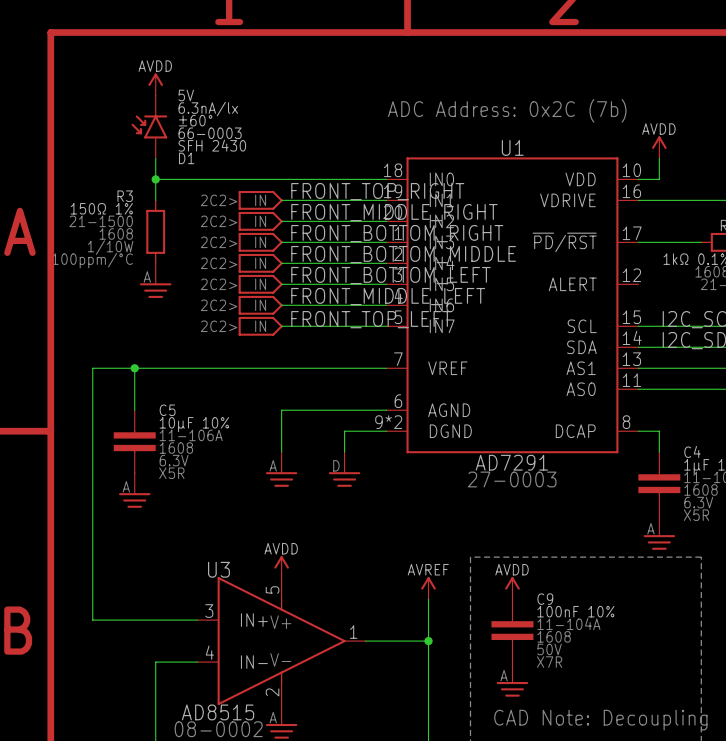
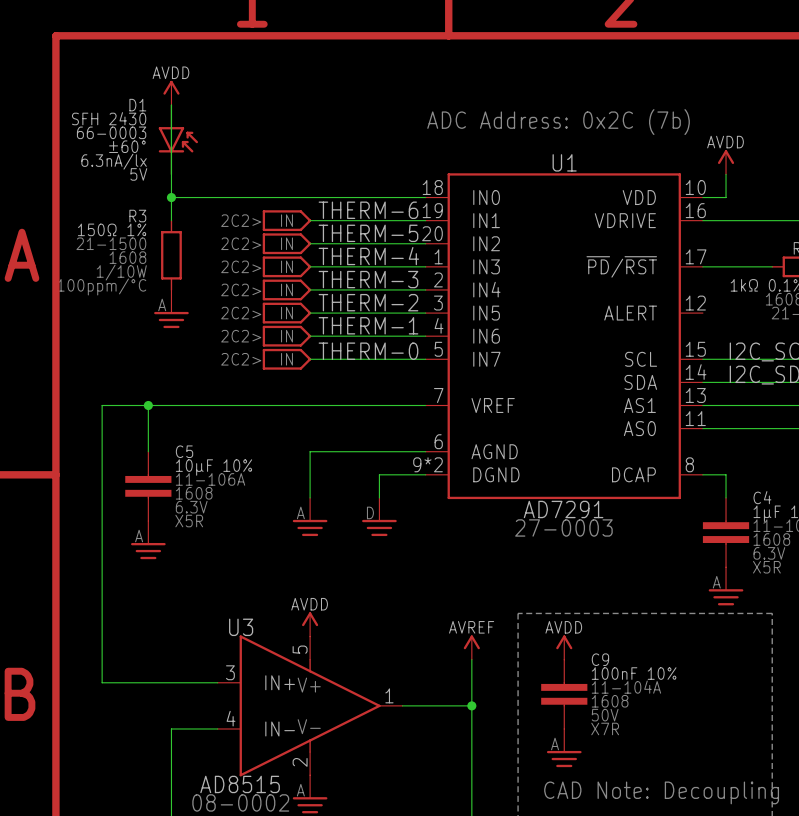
D1 rotation: 0° (149, 126) -> 180° (178, 139)
label: FRONT_TOP_RIGHT (377, 191) -> THERM-6 (368, 210)
label: FRONT_MIDDLE_RIGHT (394, 212) -> THERM-5 (368, 233)
label: FRONT_BOTTOM_RIGHT (397, 233) -> THERM-4 (368, 256)
label: FRONT_BOTTOM_MIDDLE (403, 254) -> THERM-3 (368, 279)
label: FRONT_BOTTOM_LEFT (390, 275) -> THERM-2 (368, 302)
label: FRONT_MIDDLE_LEFT (388, 296) -> THERM-1 (368, 325)
label: FRONT_TOP_LEFT (371, 319) -> THERM-0 (368, 351)

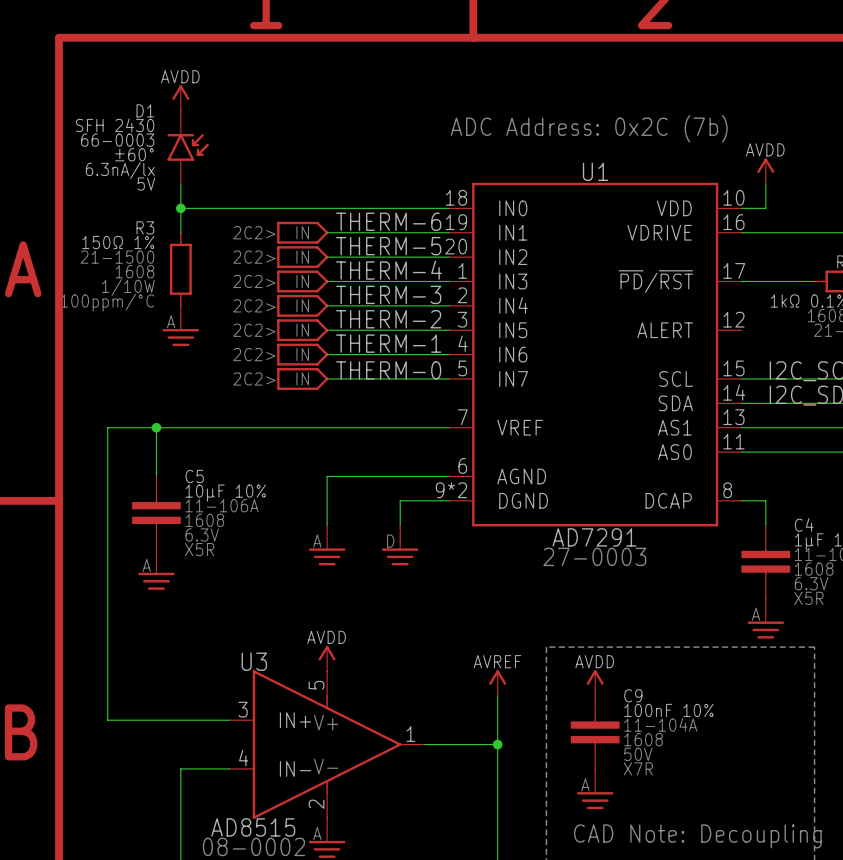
D1 flip: as is (178, 139) -> up-down (188, 147)

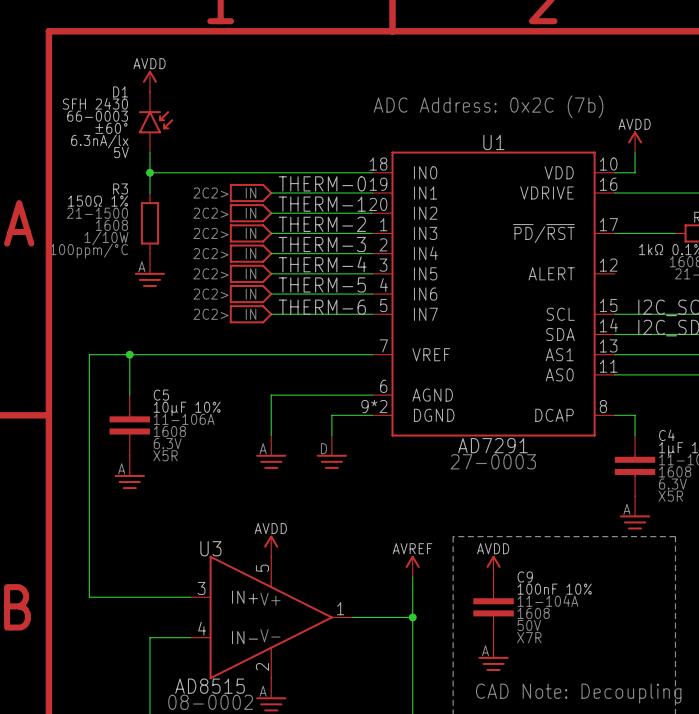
label: THERM-6 (388, 221) -> THERM-0 (322, 183)
label: THERM-5 (388, 246) -> THERM-1 (322, 204)
label: THERM-4 (389, 270) -> THERM-2 (322, 224)
label: THERM-2 (388, 319) -> THERM-4 (322, 264)
label: THERM-1 (388, 343) -> THERM-5 (322, 284)
label: THERM-0 (388, 370) -> THERM-6 (322, 307)

